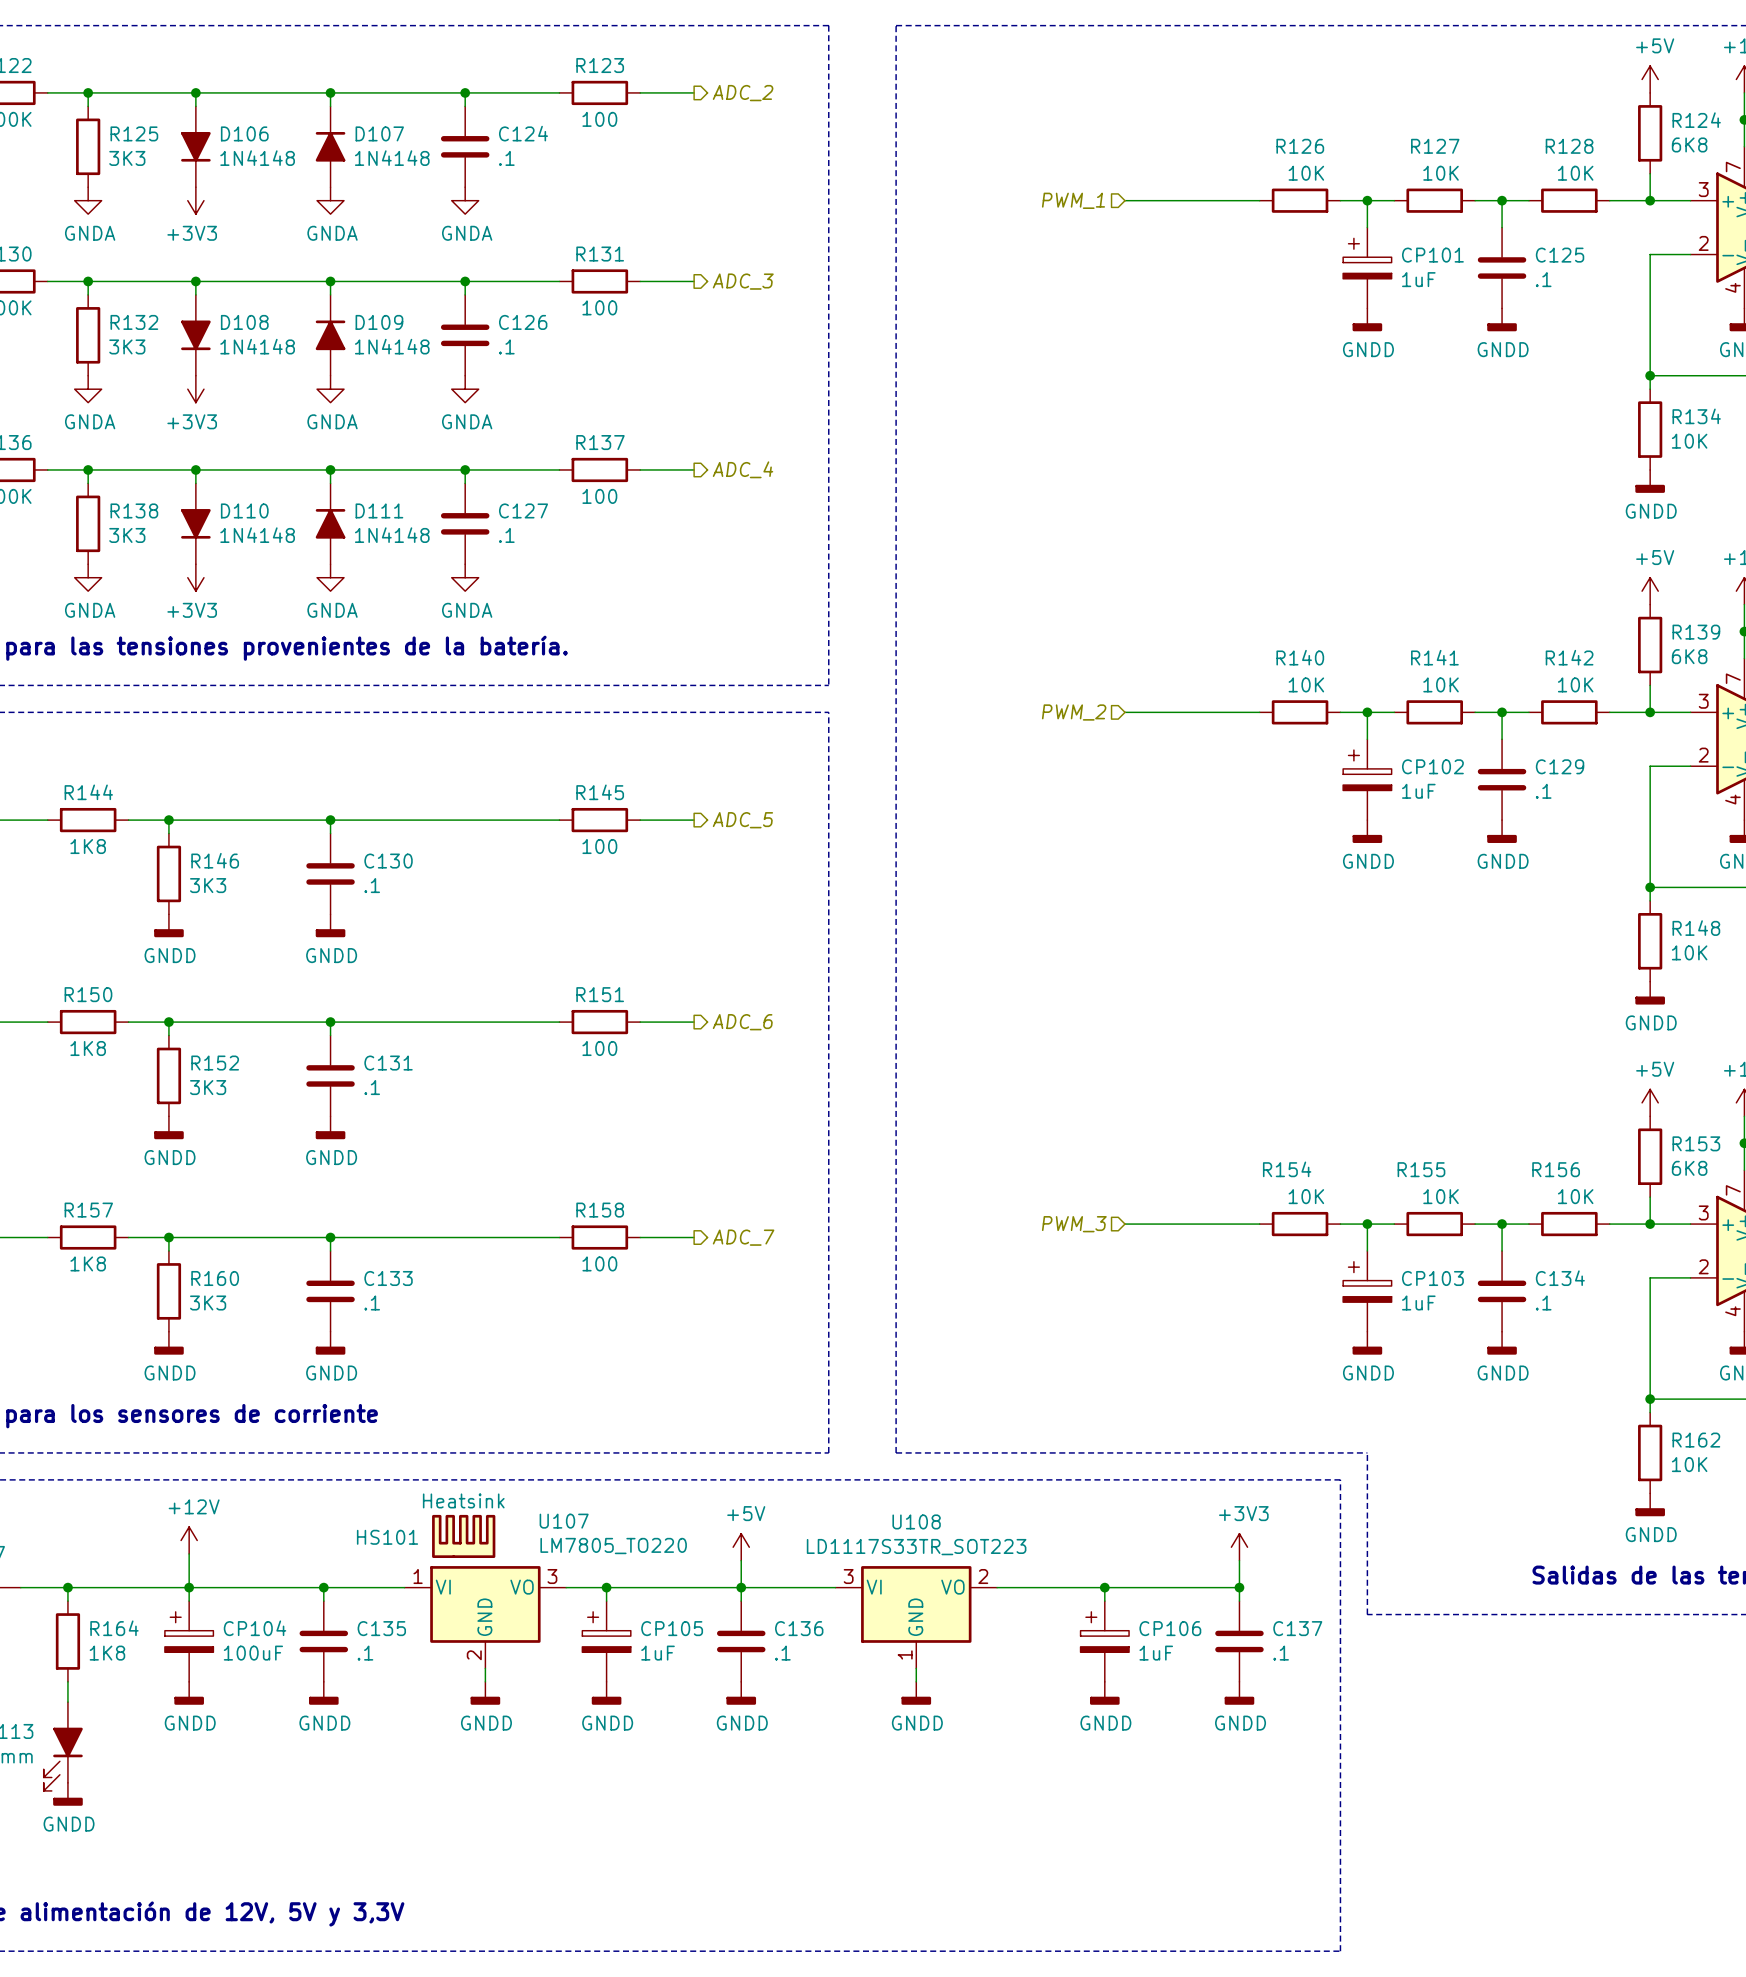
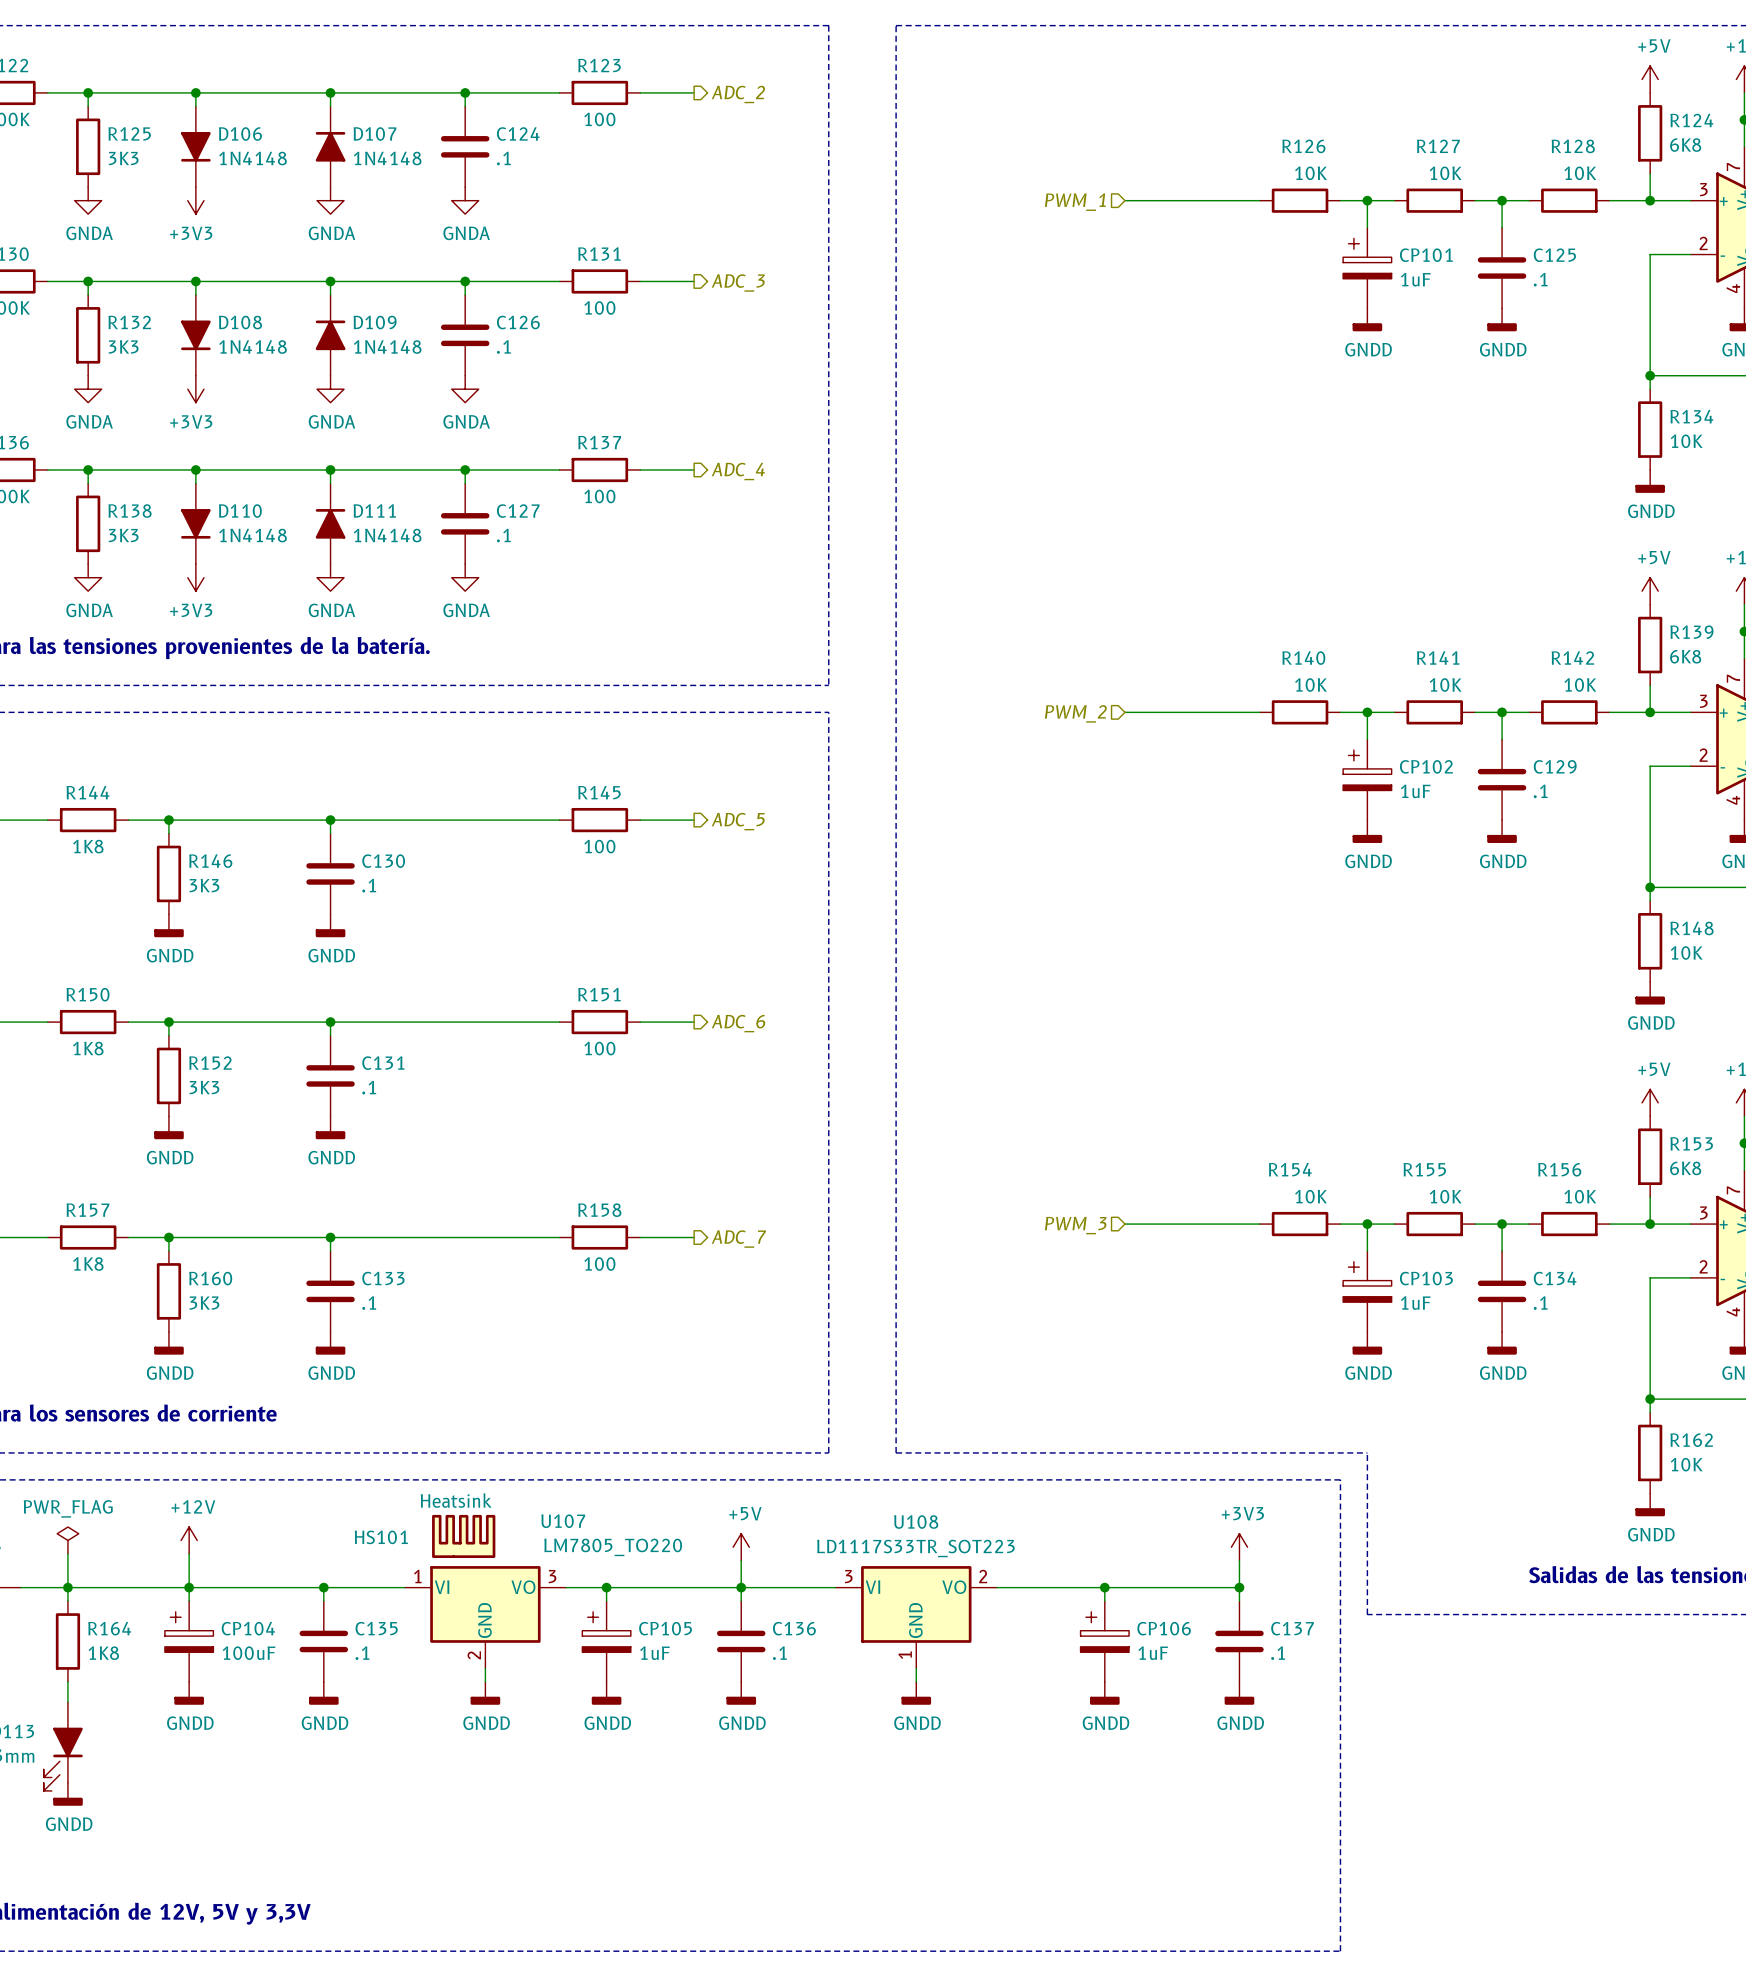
power symbol: none -> PWR_FLAG (67, 1540)
wire: none -> (67, 1553) (67, 1587)

